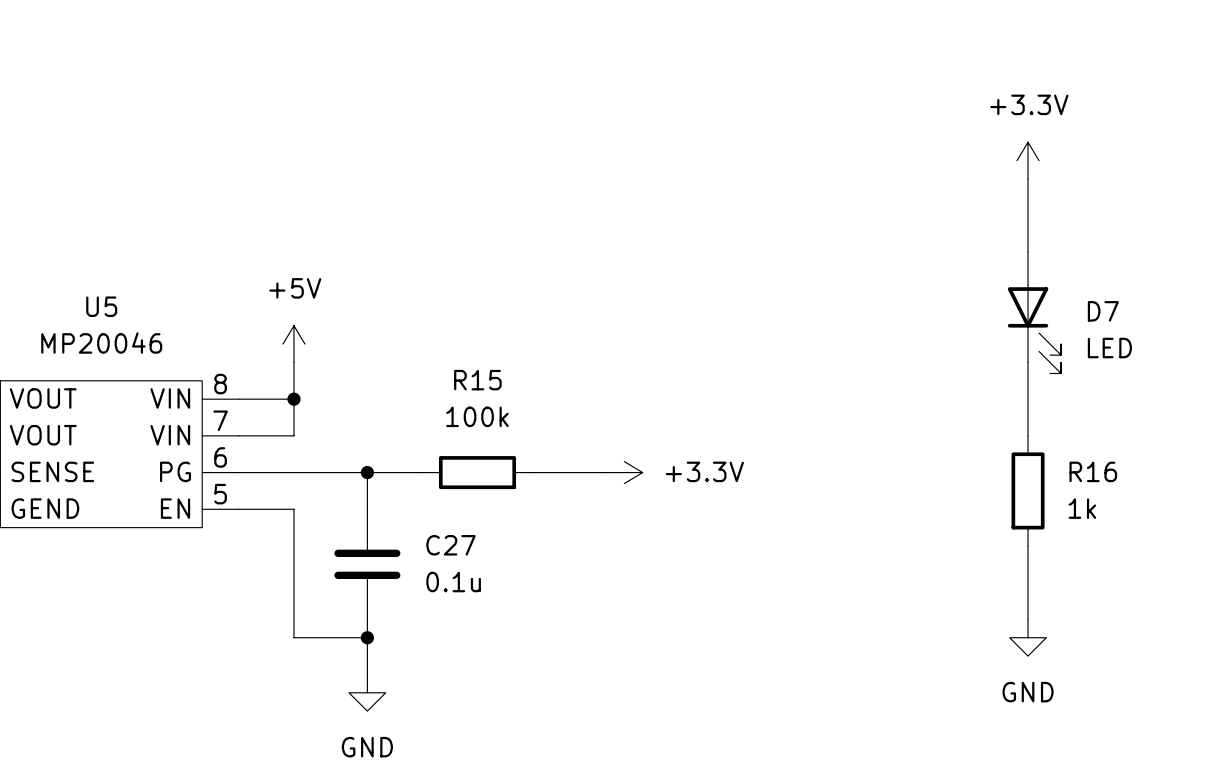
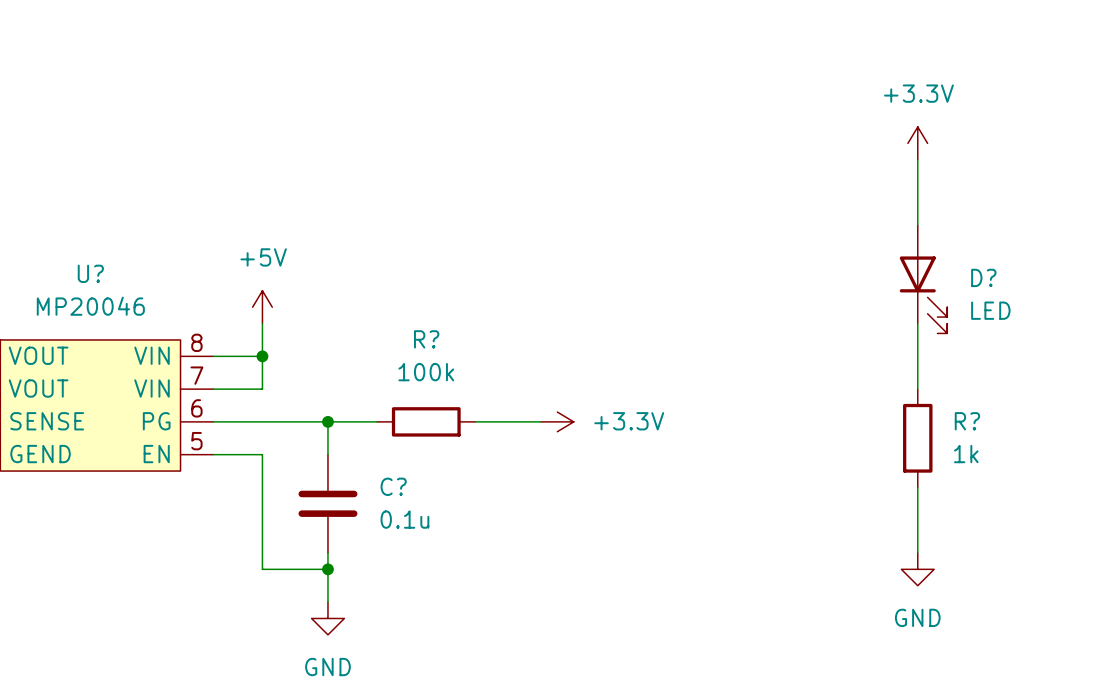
U5 name: U5 (101, 306) -> U? (90, 273)
D7 name: D7 (1103, 311) -> D? (983, 277)
R15 name: R15 (477, 380) -> R? (426, 339)
R16 name: R16 (1093, 471) -> R? (967, 421)
C27 name: C27 (450, 545) -> C? (393, 486)

